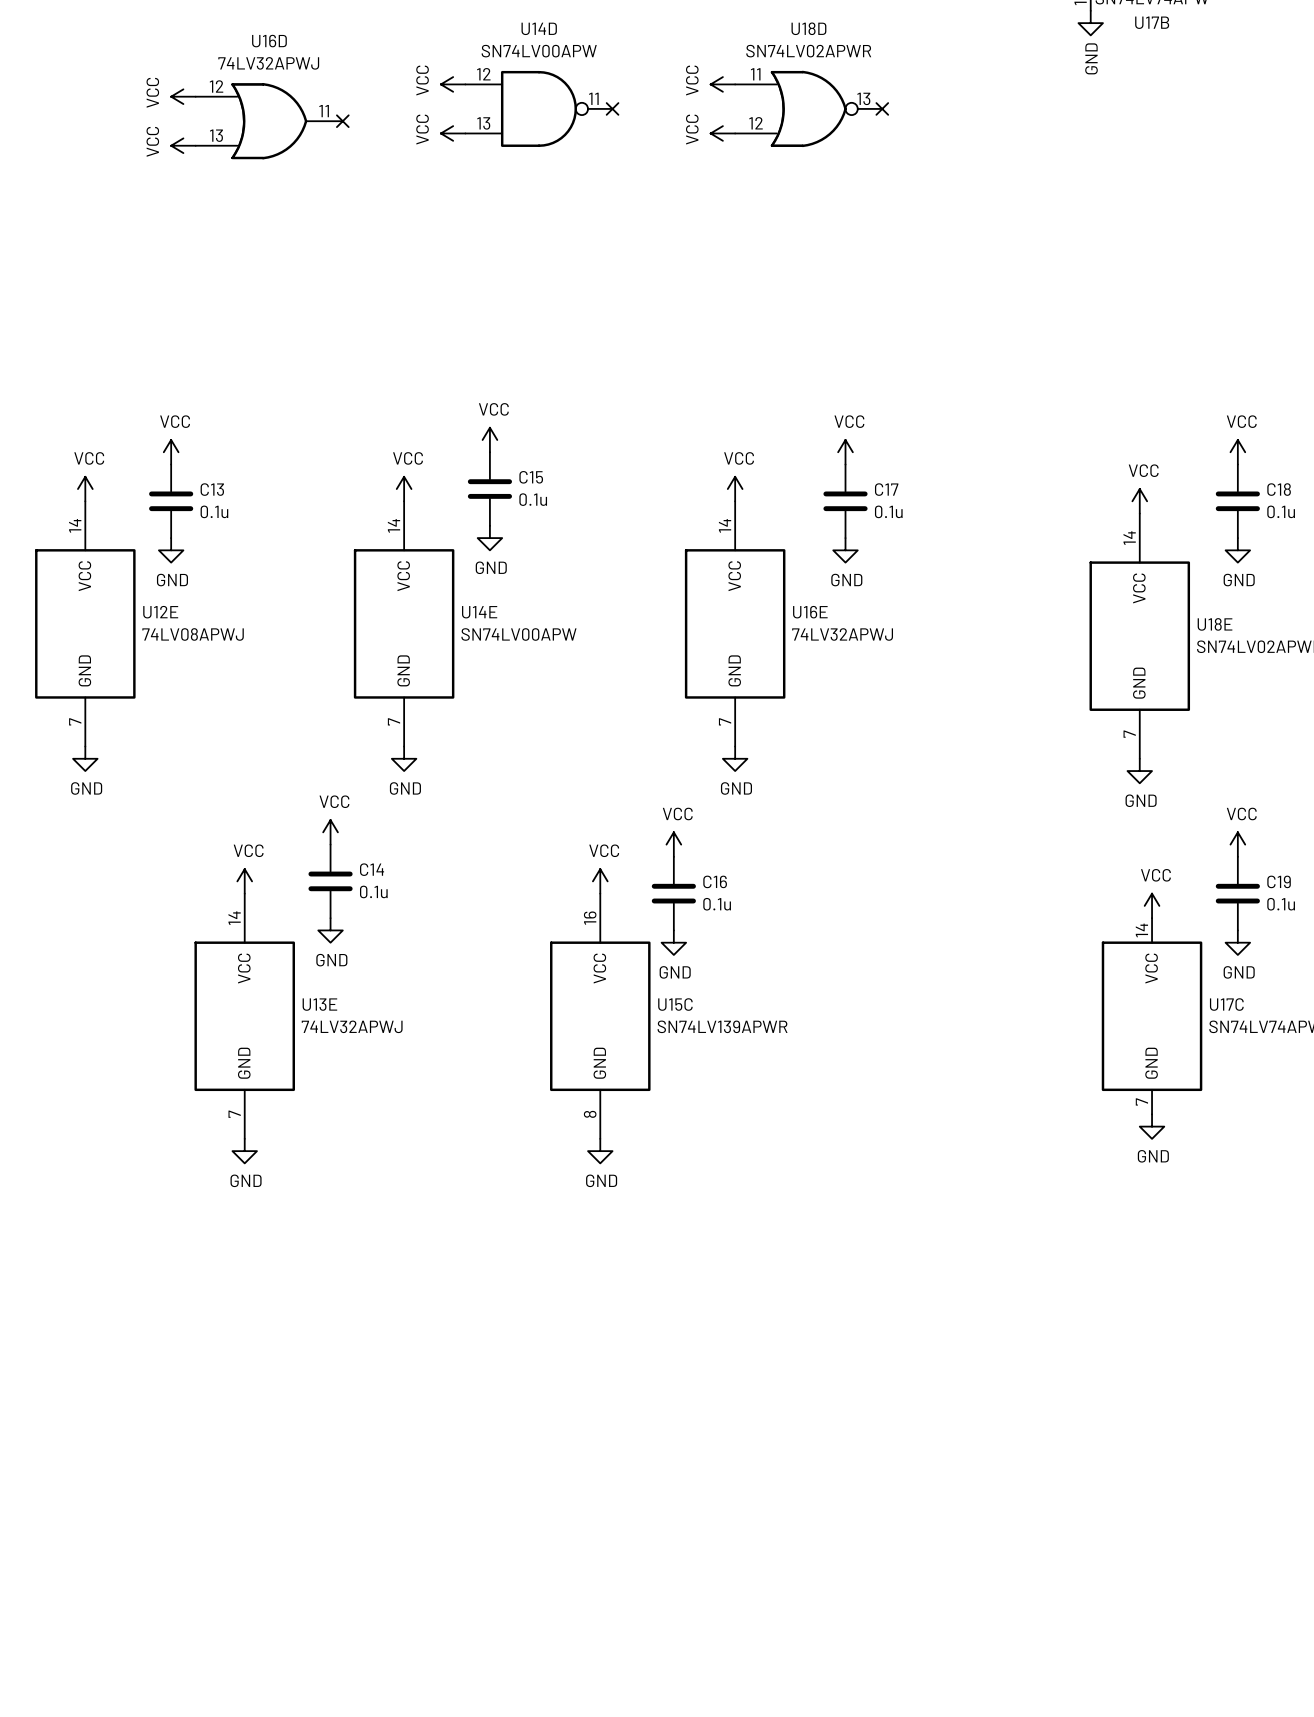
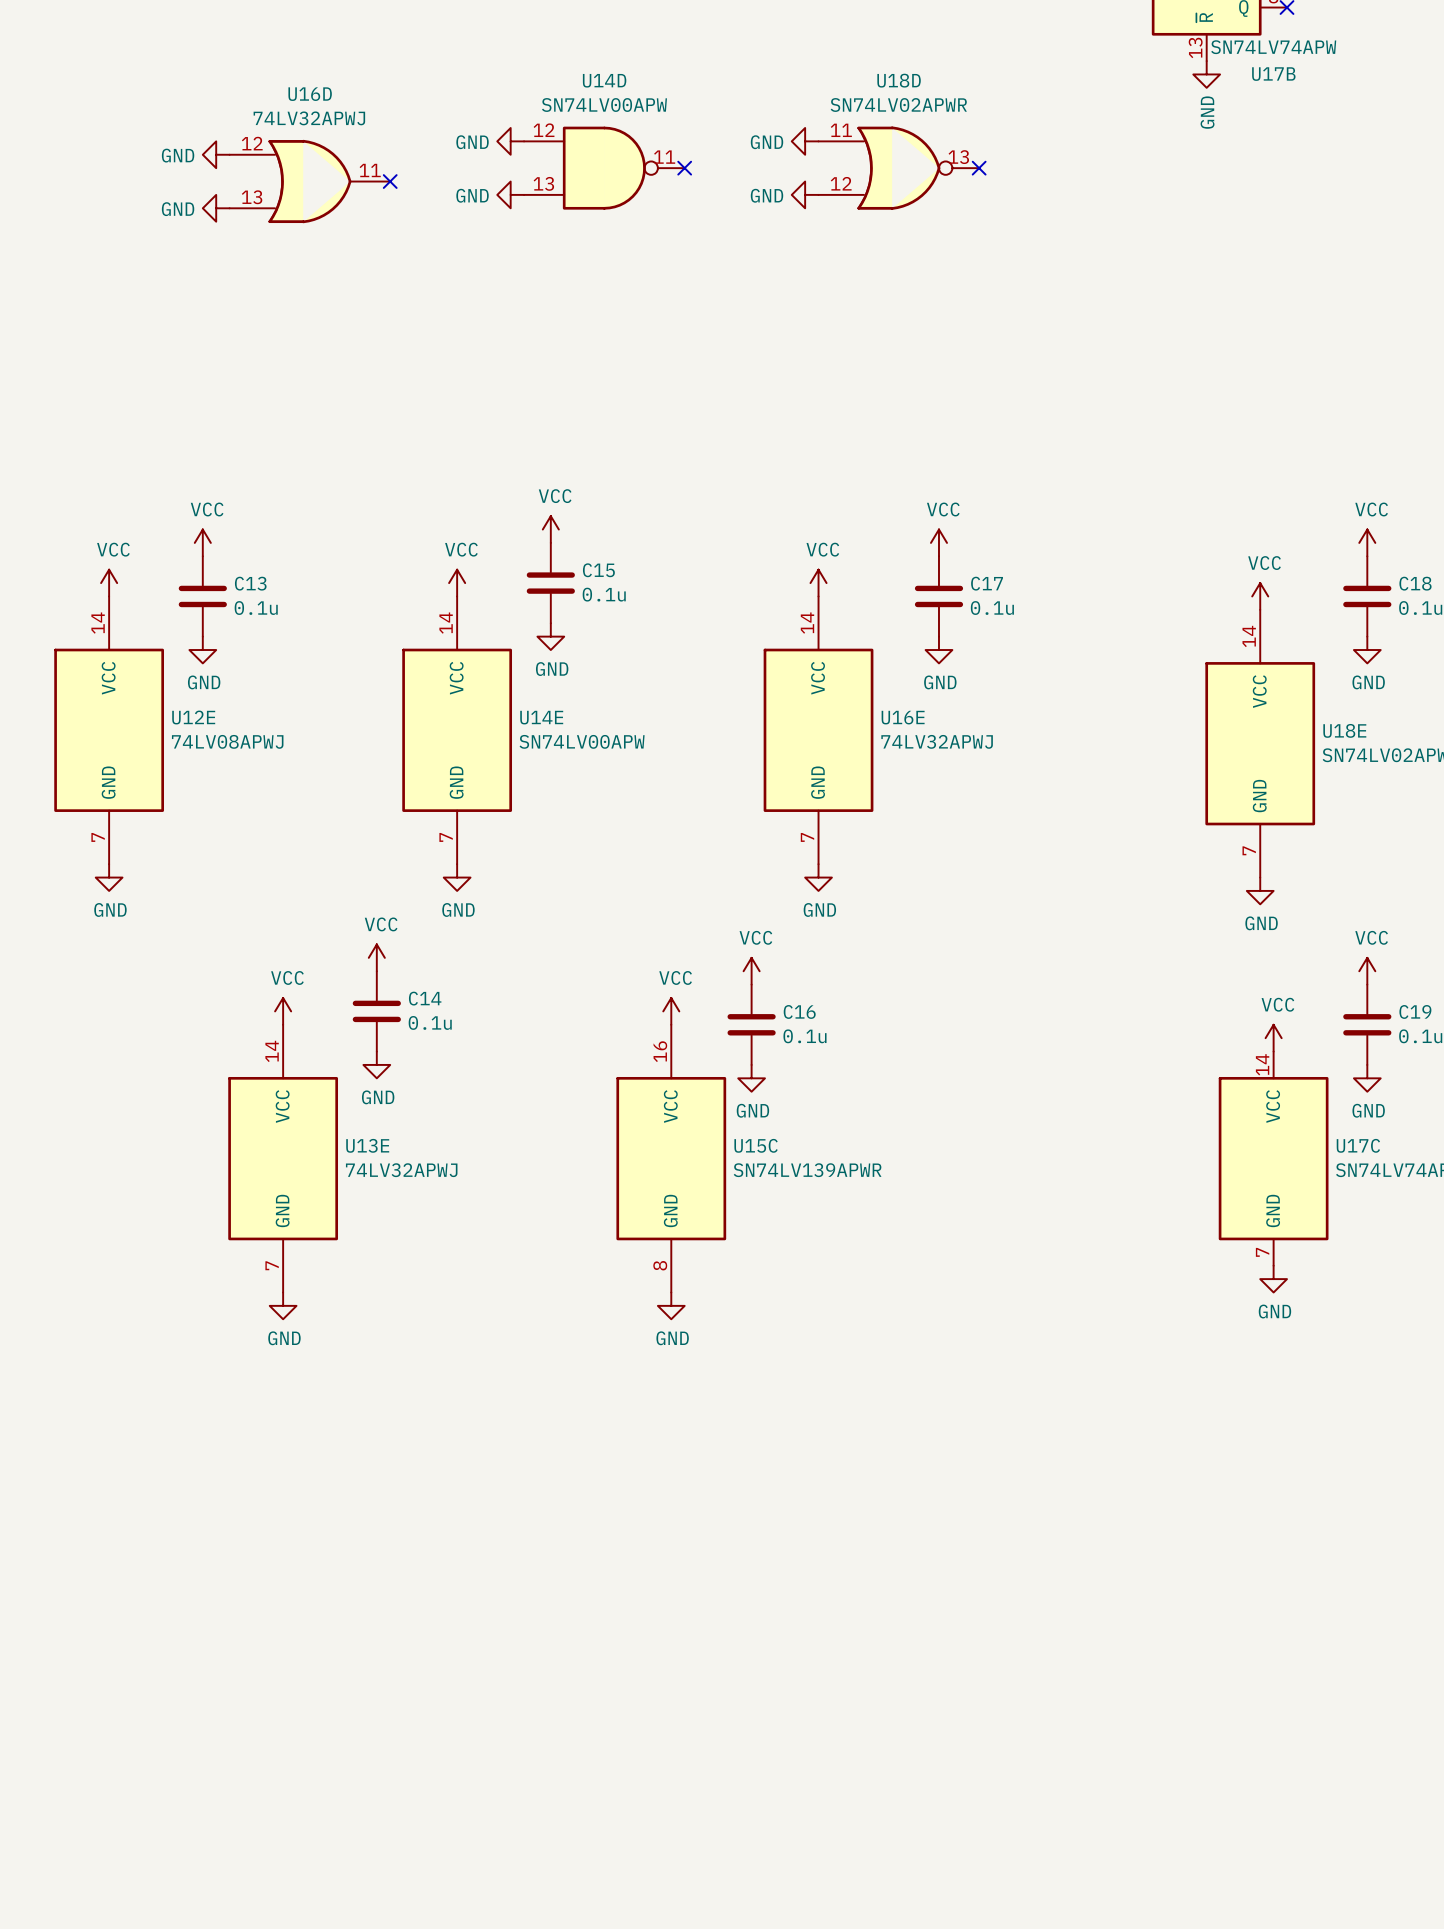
power symbol: VCC (453, 84) -> GND (510, 141)
power symbol: VCC (722, 84) -> GND (805, 141)
power symbol: VCC (183, 96) -> GND (216, 154)
power symbol: VCC (453, 133) -> GND (510, 194)
power symbol: VCC (722, 133) -> GND (805, 194)
power symbol: VCC (183, 145) -> GND (216, 208)

